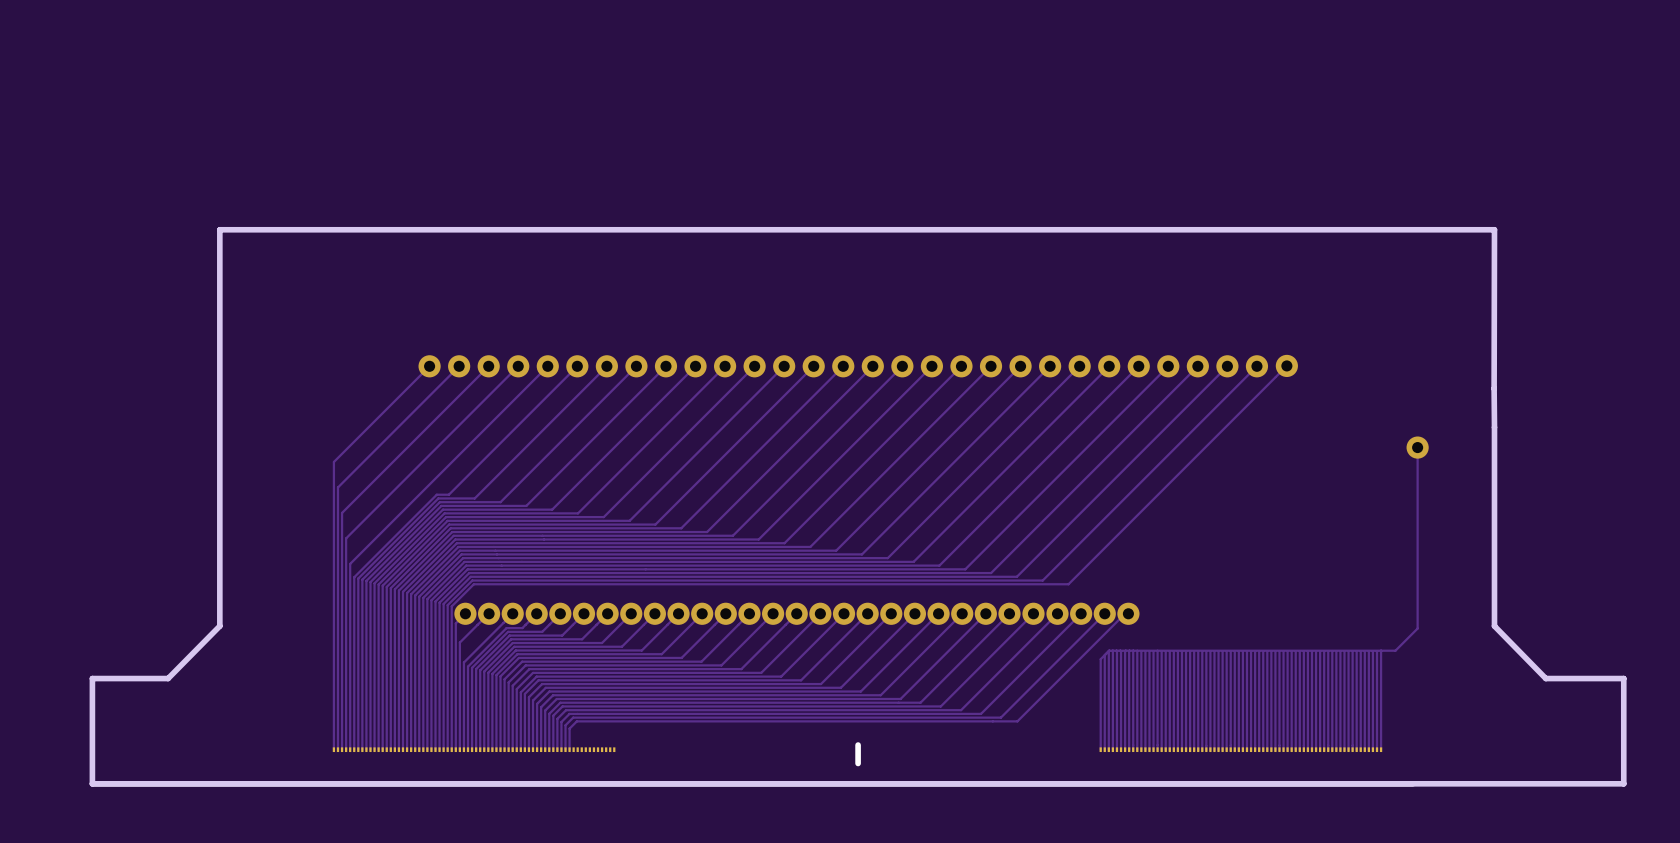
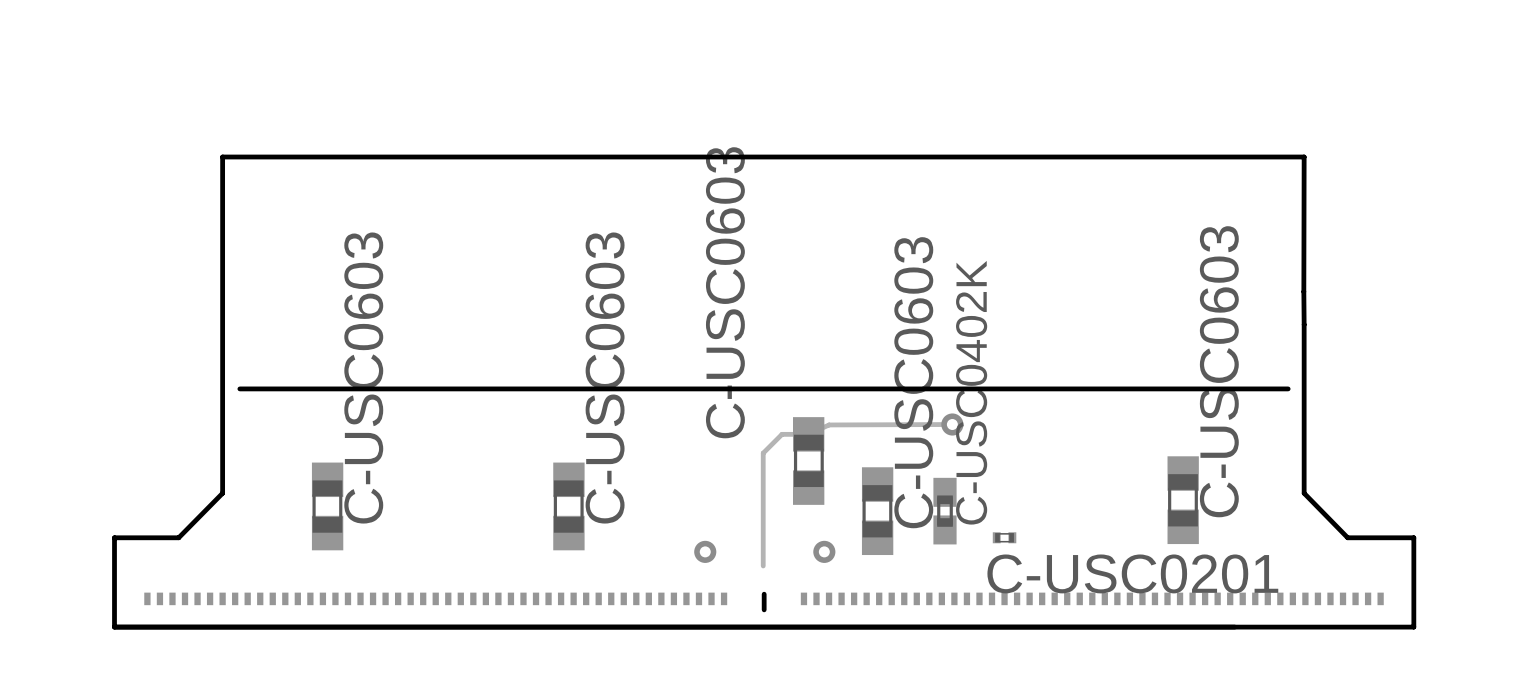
track: (1286, 365) (1068, 584) (473, 584) (451, 606) (451, 749) -> none
via: (1286, 365) -> none
track: (429, 366) (333, 461) (333, 749) -> none
via: (429, 366) -> none
track: (459, 366) (337, 487) (337, 749) -> none
via: (459, 366) -> none
track: (488, 366) (342, 512) (342, 749) -> none
via: (488, 366) -> none
track: (518, 366) (346, 538) (346, 749) -> none
via: (518, 366) -> none
track: (547, 366) (350, 563) (350, 749) -> none
via: (547, 366) -> none
track: (577, 366) (448, 494) (436, 494) (354, 577) (354, 749) -> none
via: (577, 366) -> none
track: (606, 366) (474, 498) (438, 498) (358, 578) (358, 749) -> none
via: (606, 366) -> none
track: (636, 366) (500, 502) (439, 502) (362, 579) (362, 749) -> none
via: (636, 366) -> none
track: (665, 366) (526, 505) (441, 505) (366, 580) (366, 749) -> none
via: (665, 366) -> none
track: (695, 366) (552, 509) (442, 509) (370, 582) (370, 749) -> none
via: (695, 366) -> none
track: (725, 366) (578, 513) (444, 513) (374, 583) (374, 749) -> none
via: (725, 366) -> none
track: (754, 366) (603, 517) (446, 517) (378, 584) (378, 749) -> none
via: (754, 366) -> none
track: (784, 366) (629, 520) (447, 520) (382, 585) (382, 749) -> none
via: (784, 366) -> none
track: (813, 366) (655, 524) (449, 524) (386, 586) (386, 749) -> none
via: (813, 366) -> none
track: (843, 366) (681, 528) (450, 528) (390, 588) (390, 749) -> none
via: (843, 366) -> none
track: (872, 366) (707, 532) (452, 532) (394, 589) (394, 749) -> none
via: (872, 366) -> none
track: (902, 366) (732, 535) (453, 535) (398, 590) (398, 749) -> none
via: (902, 366) -> none
track: (931, 366) (758, 539) (455, 539) (402, 591) (402, 749) -> none
via: (931, 366) -> none
track: (961, 366) (784, 543) (456, 543) (407, 593) (407, 749) -> none
via: (961, 366) -> none
track: (991, 366) (810, 546) (458, 546) (411, 594) (411, 749) -> none
via: (991, 366) -> none
track: (1020, 366) (836, 550) (459, 550) (415, 595) (415, 749) -> none
via: (1020, 366) -> none
track: (1050, 366) (862, 554) (461, 554) (419, 596) (419, 749) -> none
via: (1050, 366) -> none
track: (1079, 366) (887, 558) (463, 558) (423, 597) (423, 749) -> none
via: (1079, 366) -> none
track: (1109, 366) (913, 561) (464, 561) (427, 599) (427, 749) -> none
via: (1109, 366) -> none
track: (1138, 366) (939, 565) (466, 565) (431, 600) (431, 749) -> none
via: (1138, 366) -> none
track: (1168, 366) (965, 569) (467, 569) (435, 601) (435, 749) -> none
via: (1168, 366) -> none
track: (1197, 366) (991, 573) (469, 573) (439, 602) (439, 749) -> none
via: (1197, 366) -> none
track: (1227, 366) (1016, 576) (470, 576) (443, 603) (443, 749) -> none
via: (1227, 366) -> none
track: (1256, 366) (1042, 580) (472, 580) (447, 605) (447, 749) -> none
via: (1256, 366) -> none
track: (1417, 447) (1417, 628) (1395, 650) (1109, 650) (1100, 659) (1100, 749) -> none
via: (1417, 447) -> none
line: none -> (239, 388) (1288, 388)
track: none -> (952, 424) (829, 424) (808, 434) (782, 434) (763, 453) (763, 565)
via: none -> (952, 424)
part: none -> C-USC0603 (808, 461)
track: (465, 613) (455, 623) (455, 749) -> none
via: (465, 613) -> none
track: (489, 613) (459, 642) (459, 749) -> none
via: (489, 613) -> none
track: (512, 613) (463, 662) (463, 749) -> none
via: (512, 613) -> none
track: (536, 613) (522, 628) (506, 628) (468, 666) (468, 749) -> none
via: (536, 613) -> none
track: (560, 613) (542, 631) (508, 631) (472, 667) (472, 749) -> none
via: (560, 613) -> none
track: (580, 613) (583, 613) (562, 635) (509, 635) (476, 669) (476, 749) -> none
via: (583, 613) -> none
track: (607, 613) (582, 639) (511, 639) (480, 670) (480, 749) -> none
via: (607, 613) -> none
track: (631, 613) (602, 643) (512, 643) (484, 671) (484, 749) -> none
via: (631, 613) -> none
track: (654, 613) (621, 646) (514, 646) (488, 672) (488, 749) -> none
via: (654, 613) -> none
track: (678, 613) (641, 650) (515, 650) (492, 673) (492, 749) -> none
via: (678, 613) -> none
track: (702, 613) (661, 654) (517, 654) (496, 675) (496, 749) -> none
via: (702, 613) -> none
track: (725, 613) (681, 657) (518, 657) (500, 676) (500, 749) -> none
via: (725, 613) -> none
track: (749, 613) (701, 661) (522, 661) (504, 679) (504, 749) -> none
via: (749, 613) -> none
track: (773, 613) (721, 665) (525, 665) (508, 682) (508, 749) -> none
via: (773, 613) -> none
track: (796, 613) (741, 669) (529, 669) (512, 685) (512, 749) -> none
via: (796, 613) -> none
track: (820, 613) (761, 672) (533, 672) (516, 689) (516, 749) -> none
via: (820, 613) -> none
track: (844, 613) (781, 676) (536, 676) (520, 692) (520, 749) -> none
via: (844, 613) -> none
track: (867, 613) (801, 680) (538, 680) (524, 693) (524, 749) -> none
via: (867, 613) -> none
track: (891, 613) (821, 684) (542, 684) (528, 697) (528, 749) -> none
via: (891, 613) -> none
track: (914, 613) (840, 687) (545, 687) (533, 700) (533, 749) -> none
via: (914, 613) -> none
track: (938, 613) (860, 691) (549, 691) (537, 703) (537, 749) -> none
via: (938, 613) -> none
track: (962, 613) (880, 695) (553, 695) (541, 707) (541, 749) -> none
via: (962, 613) -> none
track: (985, 613) (900, 698) (556, 698) (545, 710) (545, 749) -> none
via: (985, 613) -> none
track: (1009, 613) (920, 702) (560, 702) (549, 713) (549, 749) -> none
via: (1009, 613) -> none
track: (1033, 613) (940, 706) (562, 706) (553, 715) (553, 749) -> none
via: (1033, 613) -> none
track: (1057, 613) (961, 710) (566, 710) (557, 718) (557, 749) -> none
via: (1057, 613) -> none
track: (1081, 613) (981, 713) (569, 713) (561, 722) (561, 749) -> none
via: (1081, 613) -> none
track: (1104, 613) (1000, 717) (573, 717) (565, 725) (565, 749) -> none
via: (1104, 613) -> none
track: (1128, 613) (1125, 613) (1017, 721) (576, 721) (569, 728) (569, 749) -> none
via: (1128, 613) -> none
part: none -> C-USC0603 (1183, 500)
part: none -> C-USC0603 (327, 506)
part: none -> C-USC0603 (568, 506)
part: none -> C-USC0603 (877, 511)
part: none -> C-USC0402K (945, 511)
track: (1112, 650) (1112, 749) -> none
track: (1120, 650) (1121, 749) -> none
track: (1125, 650) (1125, 749) -> none
track: (1133, 650) (1133, 749) -> none
track: (1137, 650) (1137, 749) -> none
track: (1157, 650) (1157, 749) -> none
track: (1381, 650) (1381, 749) -> none
track: (1108, 651) (1108, 749) -> none
track: (1116, 651) (1116, 749) -> none
track: (1129, 651) (1129, 749) -> none
track: (1141, 651) (1141, 749) -> none
track: (1145, 651) (1145, 749) -> none
track: (1149, 651) (1149, 749) -> none
track: (1153, 651) (1153, 749) -> none
track: (1161, 651) (1161, 750) -> none
track: (1165, 651) (1165, 750) -> none
track: (1169, 651) (1169, 750) -> none
track: (1173, 651) (1173, 750) -> none
track: (1177, 651) (1177, 750) -> none
track: (1181, 651) (1181, 750) -> none
track: (1186, 651) (1186, 750) -> none
track: (1190, 651) (1190, 750) -> none
track: (1202, 651) (1202, 750) -> none
track: (1206, 651) (1206, 750) -> none
track: (1210, 651) (1210, 750) -> none
track: (1214, 651) (1214, 750) -> none
track: (1218, 651) (1218, 750) -> none
track: (1222, 651) (1222, 750) -> none
track: (1226, 651) (1226, 750) -> none
track: (1230, 651) (1230, 750) -> none
track: (1234, 651) (1234, 750) -> none
track: (1238, 651) (1238, 750) -> none
track: (1242, 651) (1242, 750) -> none
track: (1246, 651) (1246, 750) -> none
track: (1251, 651) (1251, 750) -> none
track: (1255, 651) (1255, 750) -> none
track: (1259, 651) (1259, 750) -> none
track: (1263, 651) (1263, 750) -> none
track: (1267, 651) (1267, 750) -> none
track: (1271, 651) (1271, 750) -> none
track: (1275, 651) (1275, 750) -> none
track: (1279, 651) (1279, 750) -> none
track: (1283, 651) (1283, 750) -> none
track: (1287, 651) (1287, 750) -> none
track: (1291, 651) (1291, 750) -> none
track: (1295, 651) (1295, 750) -> none
track: (1299, 651) (1299, 750) -> none
track: (1303, 651) (1303, 750) -> none
track: (1307, 651) (1307, 750) -> none
track: (1311, 651) (1311, 750) -> none
track: (1316, 651) (1316, 750) -> none
track: (1320, 651) (1320, 750) -> none
track: (1324, 651) (1324, 750) -> none
track: (1328, 651) (1328, 750) -> none
track: (1332, 651) (1332, 750) -> none
track: (1336, 651) (1336, 750) -> none
track: (1340, 651) (1340, 750) -> none
track: (1344, 651) (1344, 750) -> none
track: (1348, 651) (1348, 750) -> none
track: (1352, 651) (1352, 750) -> none
track: (1356, 651) (1356, 750) -> none
track: (1360, 651) (1360, 750) -> none
track: (1364, 651) (1364, 750) -> none
track: (1368, 651) (1368, 750) -> none
track: (1372, 651) (1372, 750) -> none
track: (1376, 651) (1376, 750) -> none
track: (1194, 652) (1194, 750) -> none
track: (1198, 652) (1198, 750) -> none
track: (1104, 655) (1104, 749) -> none
part: none -> C-USC0201 (1004, 537)
via: none -> (705, 551)
via: none -> (824, 551)
part footprint: [332, 747, 616, 753] -> [144, 592, 728, 606]
part footprint: [1099, 747, 1383, 753] -> [800, 592, 1384, 606]

